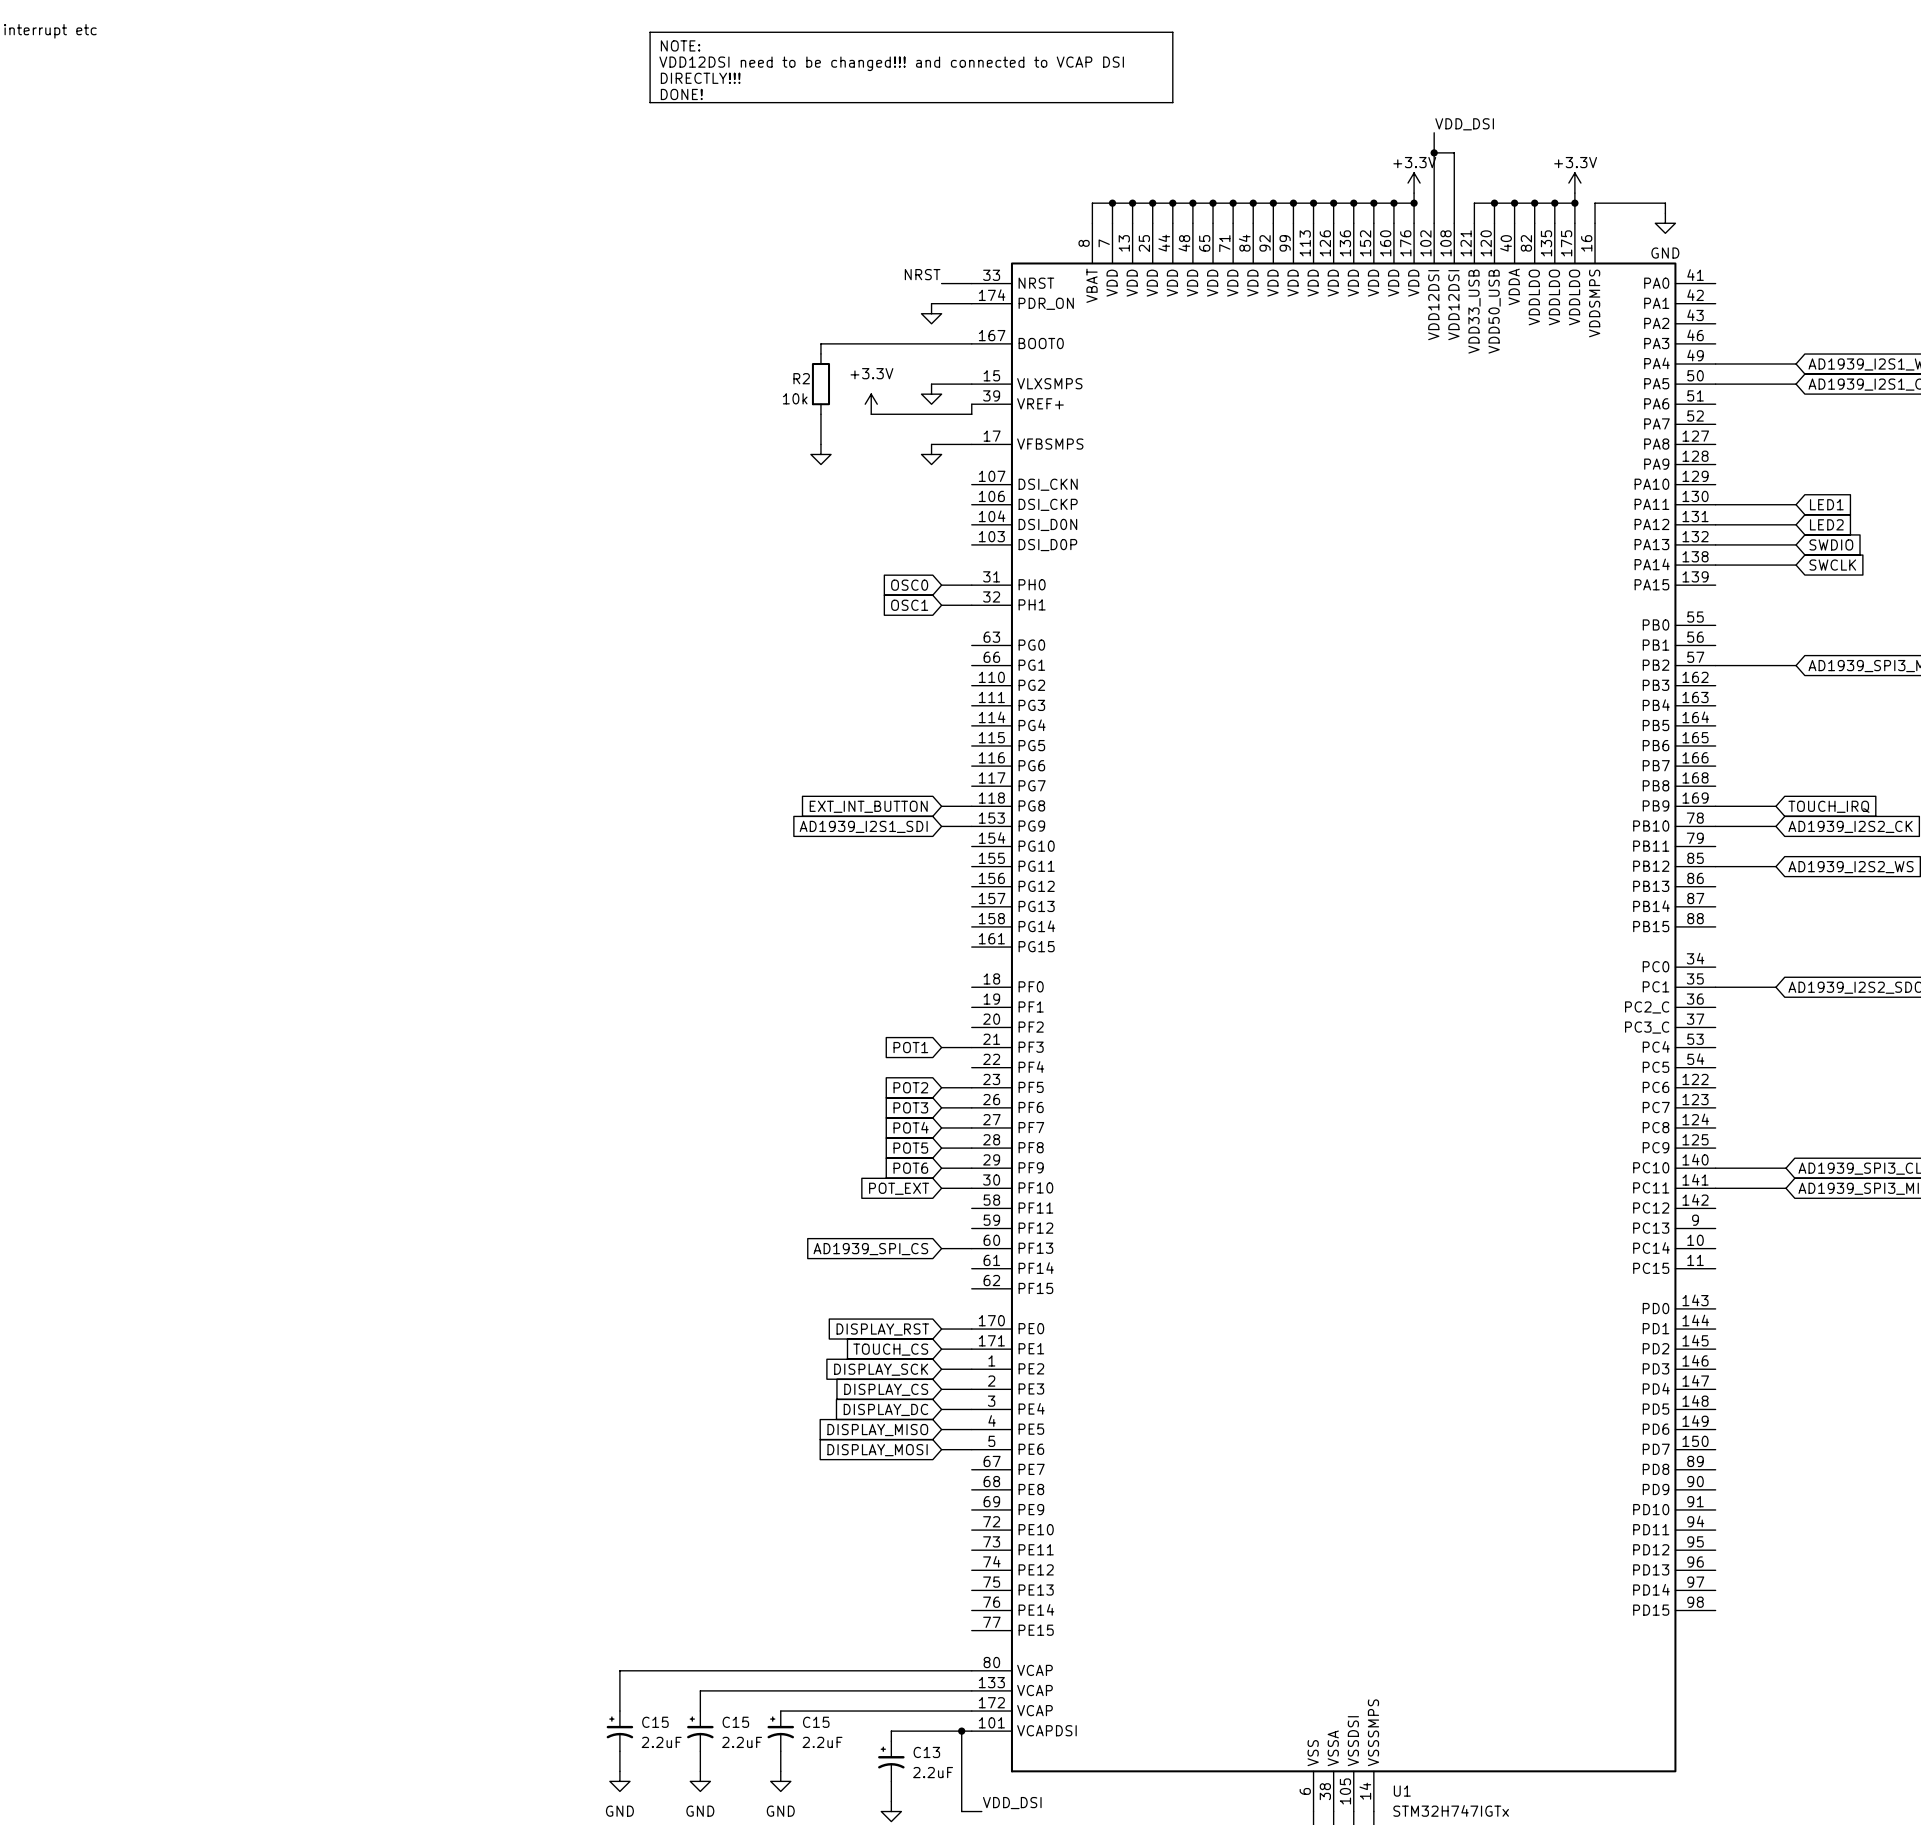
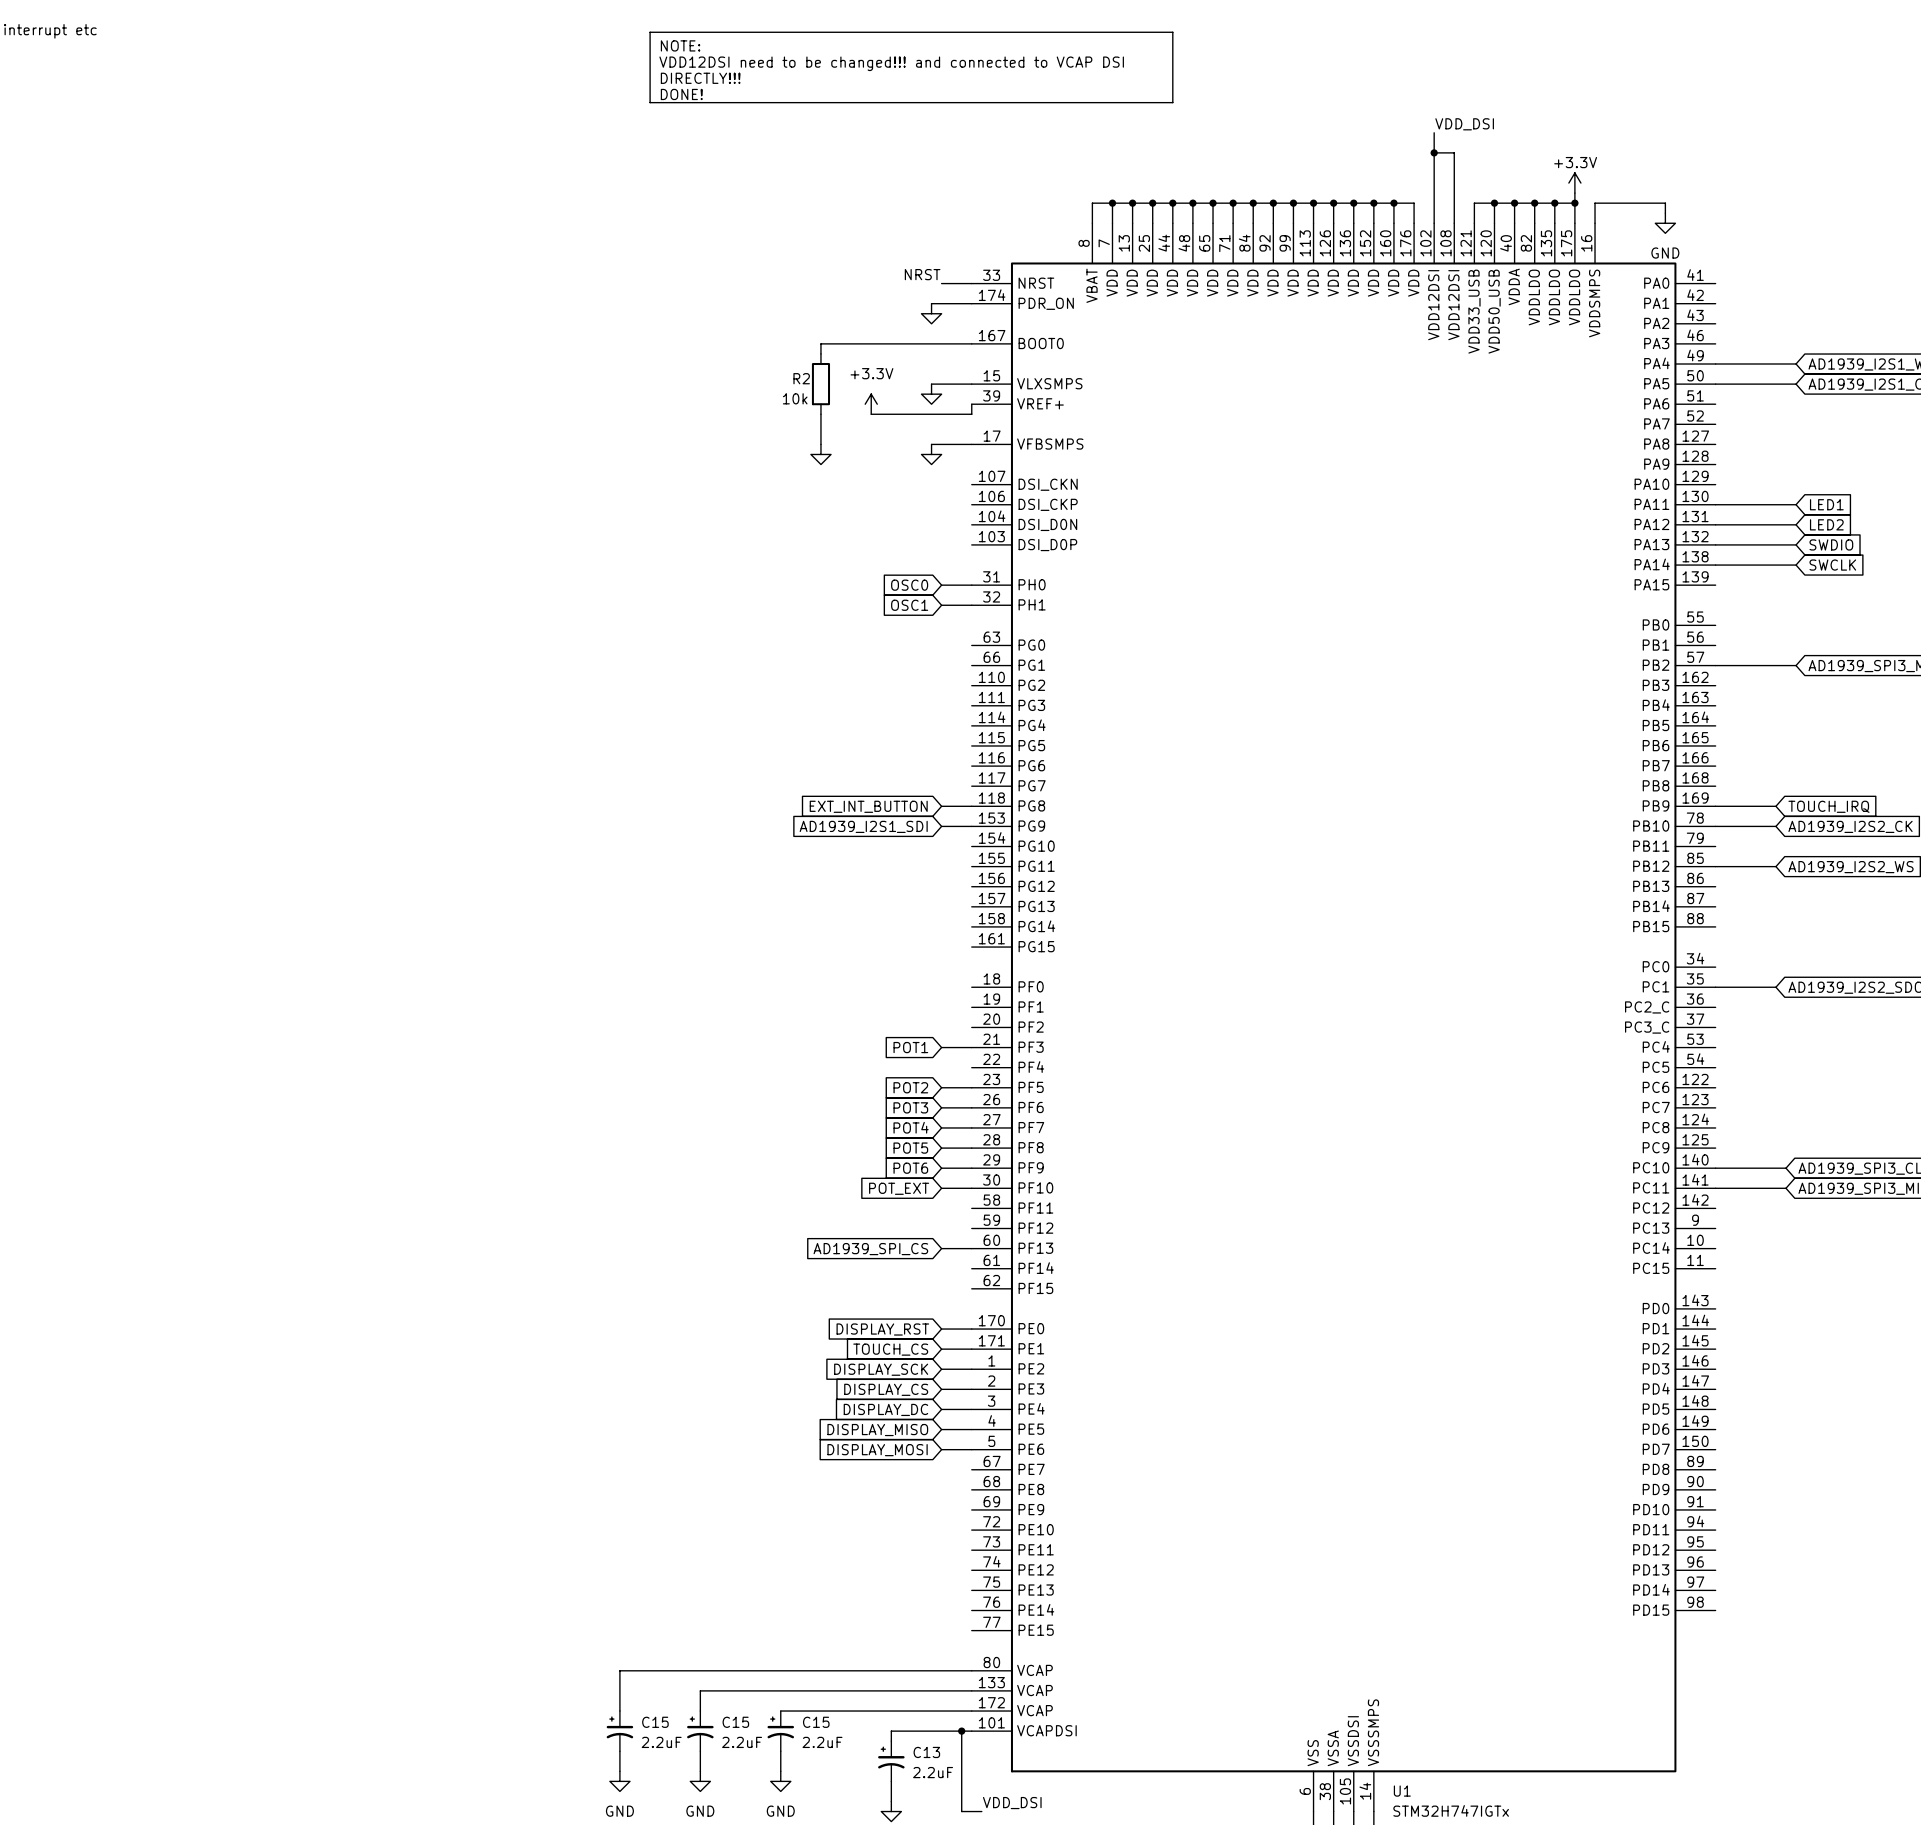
power symbol: +3.3V (1414, 183) -> none
wire: (1414, 193) (1414, 203) -> none
junction: (1414, 203) -> none

